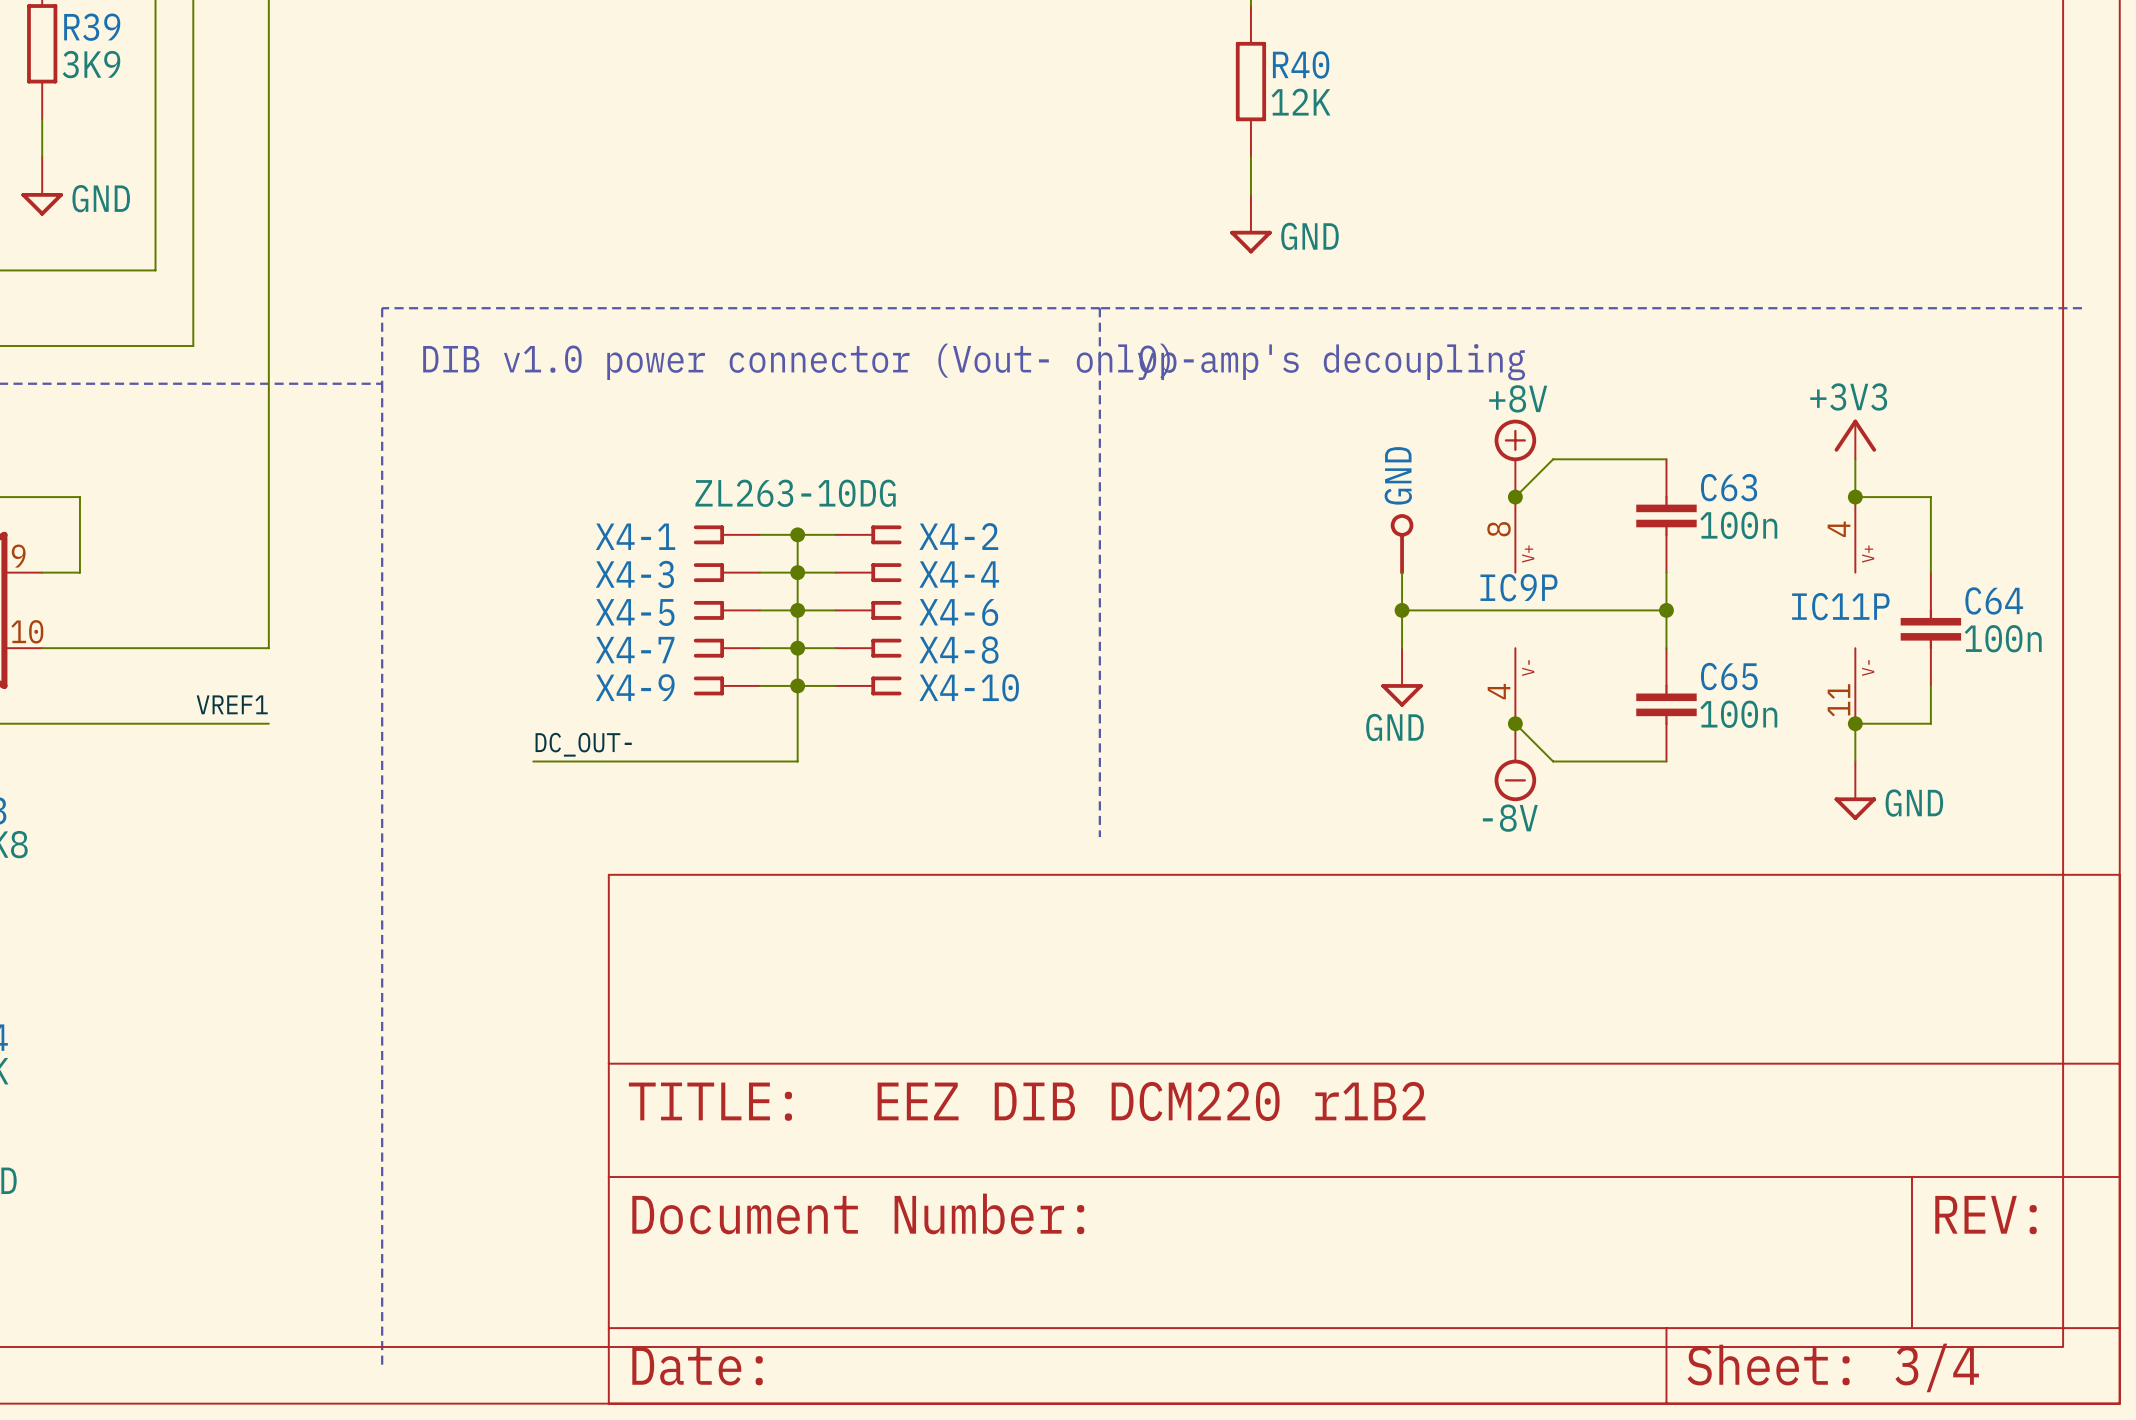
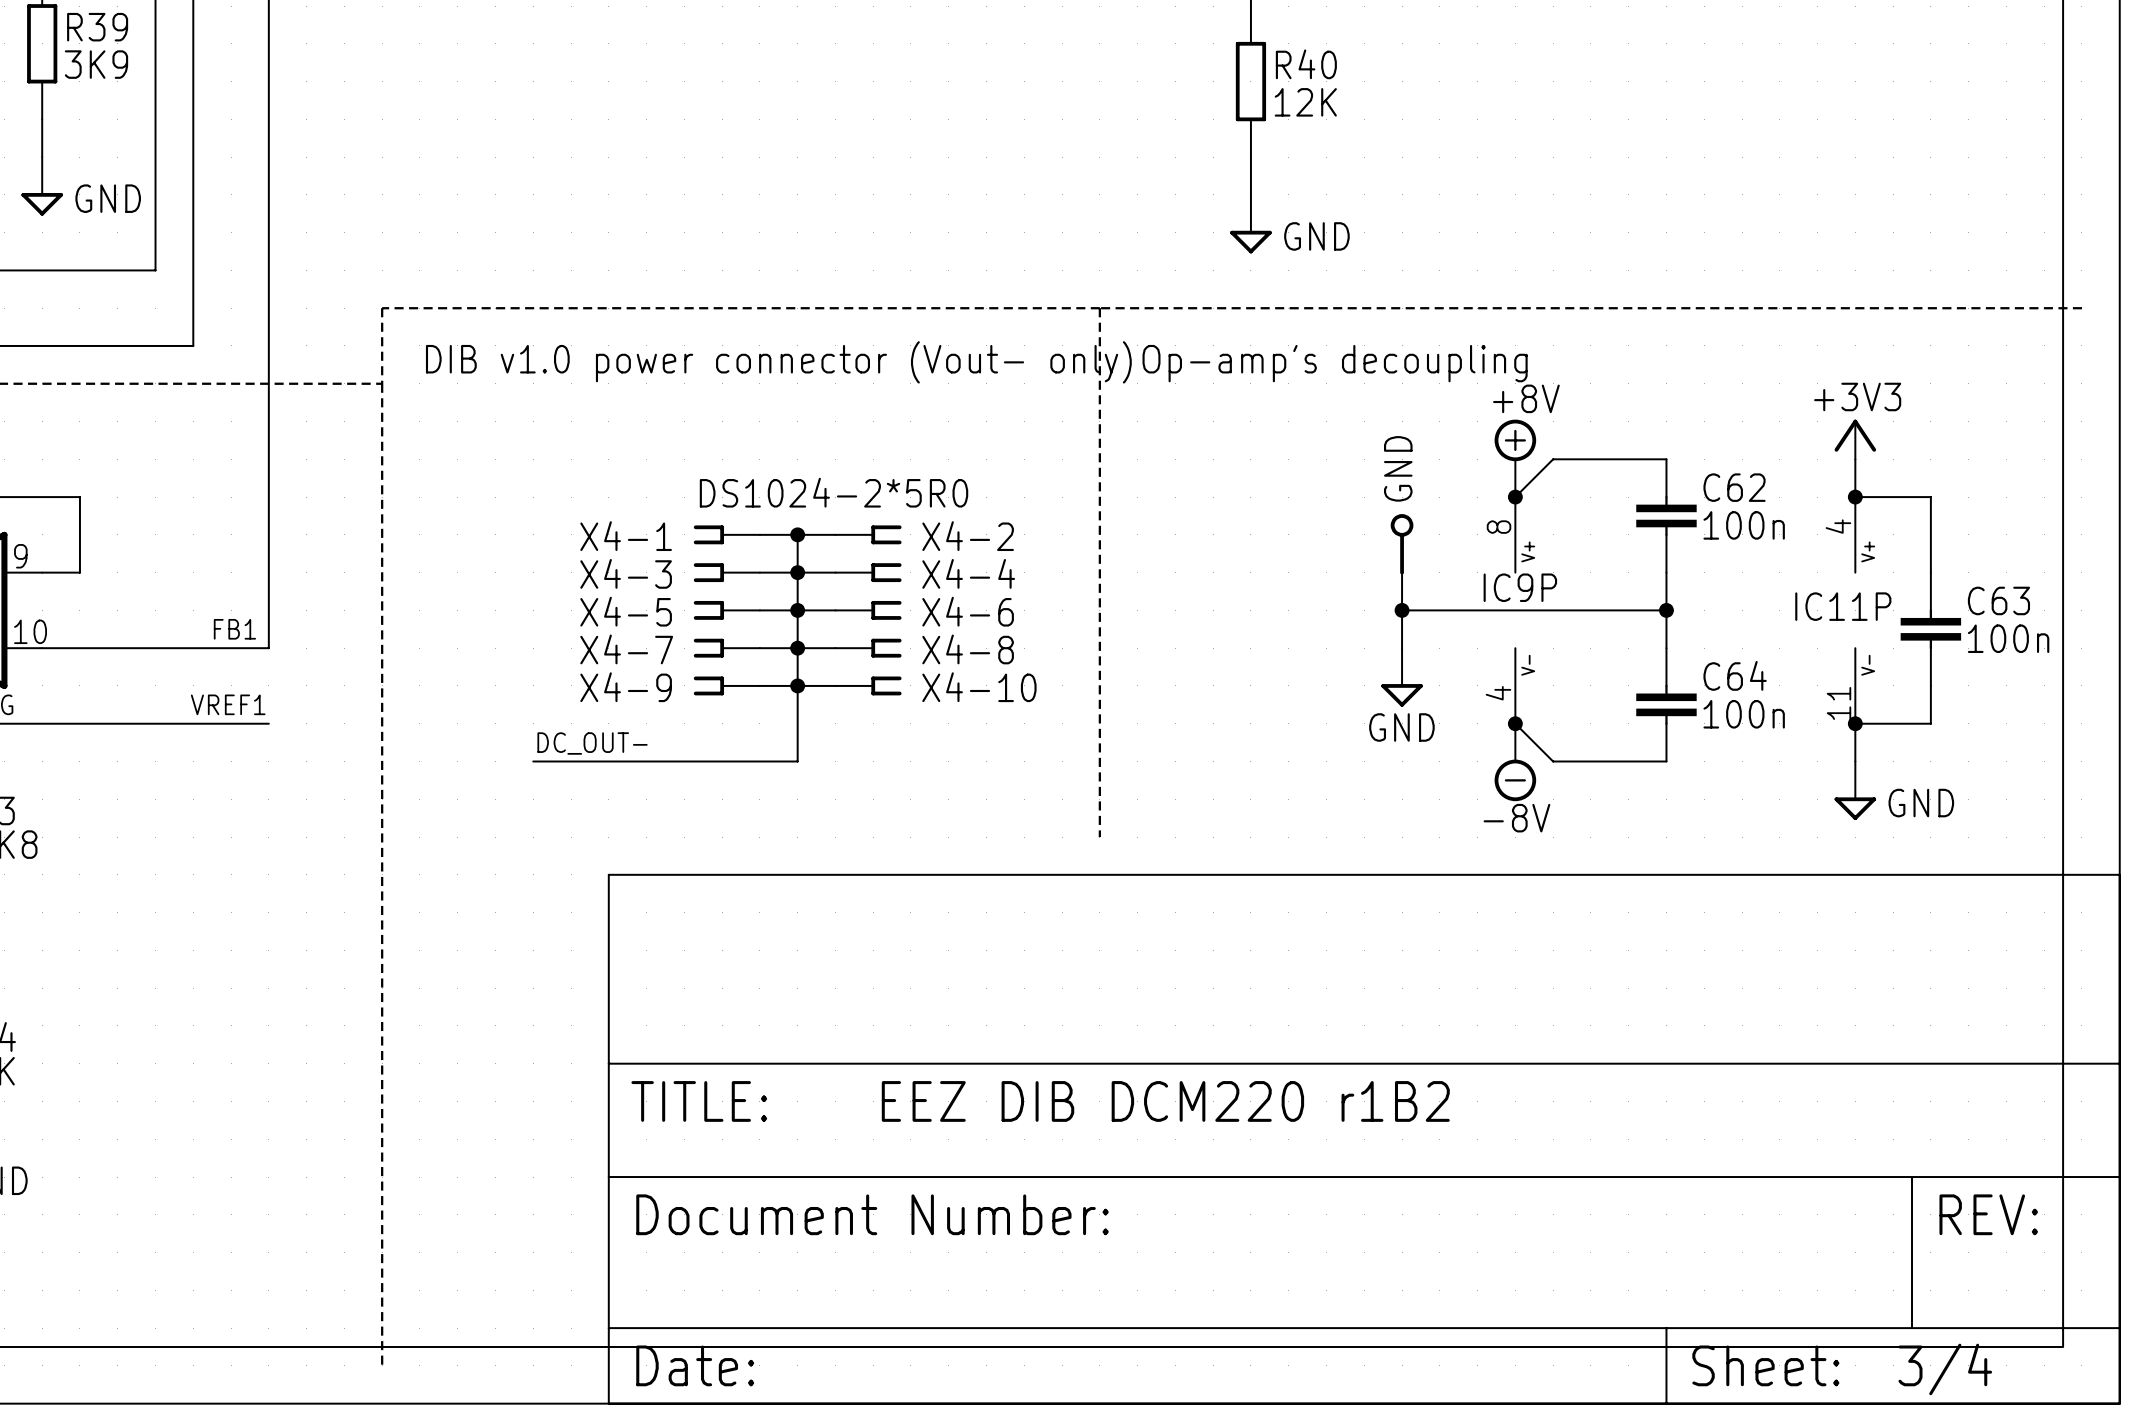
C63 name: C63 (1729, 487) -> C62 (1734, 487)
X4-1 value: ZL263-10DG (795, 493) -> DS1024-2*5R0 (834, 492)
C64 name: C64 (1994, 600) -> C63 (1998, 600)
label: none -> FB1 (234, 629)
C65 name: C65 (1729, 676) -> C64 (1735, 675)

